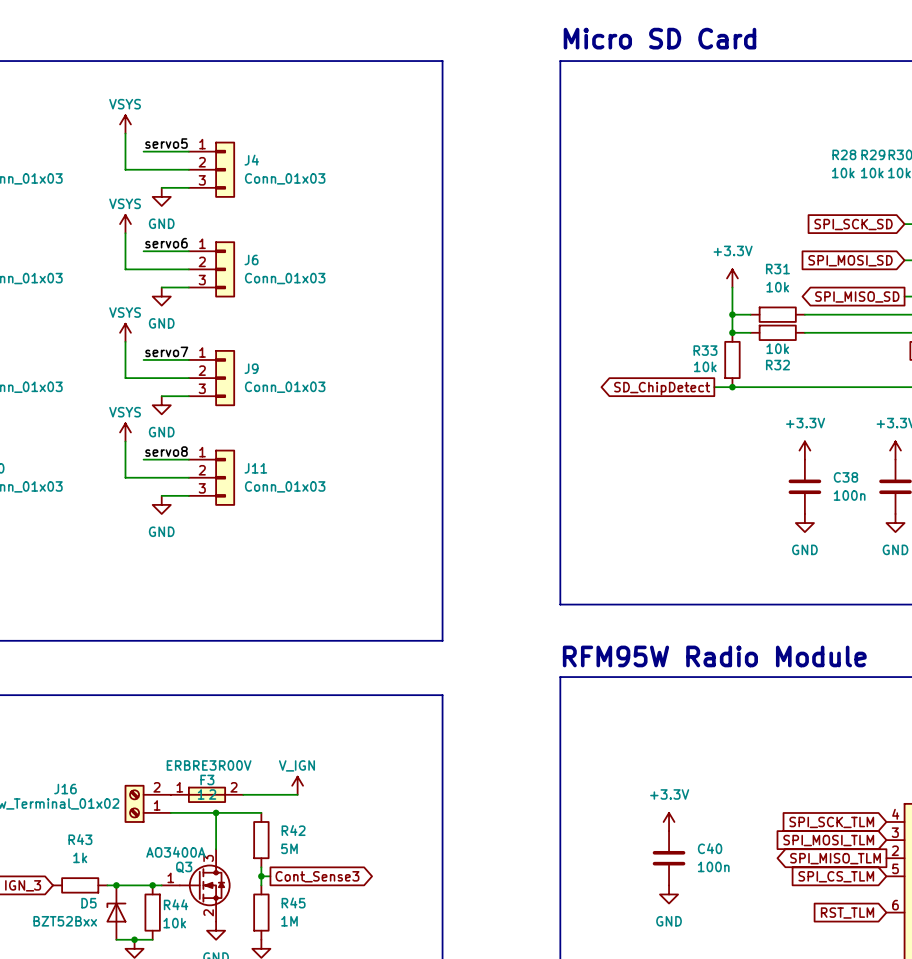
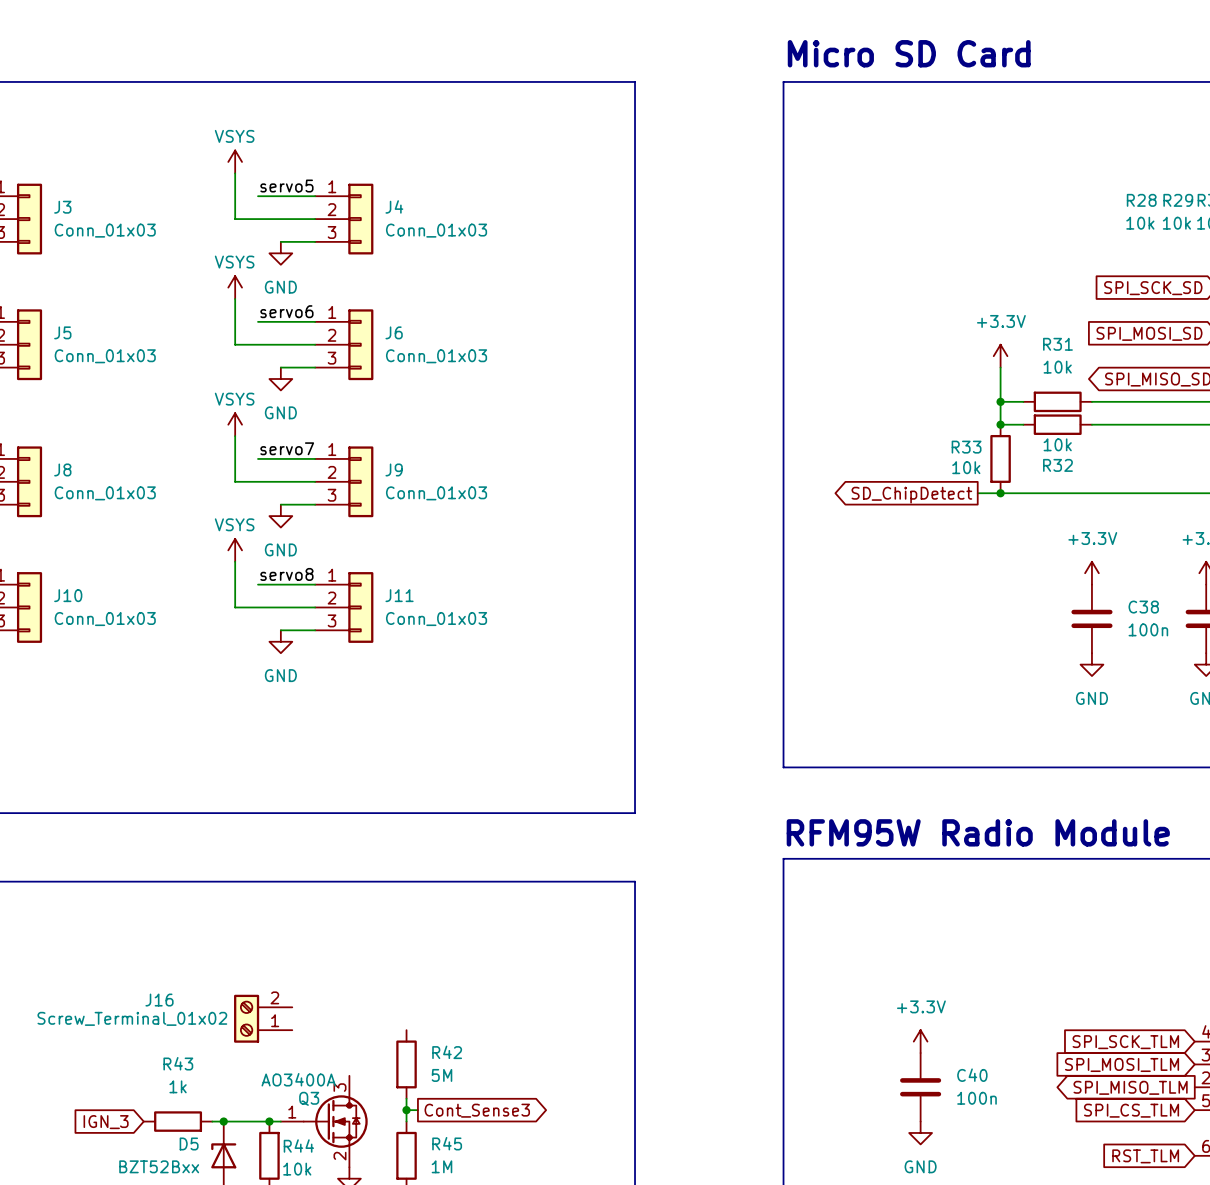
power symbol: V_IGN (297, 785) -> none
F3: ERBRE3R00V (207, 794) -> none
wire: (243, 794) (297, 794) -> none
wire: (170, 812) (261, 812) -> none
wire: (216, 812) (216, 849) -> none
junction: (216, 812) -> none

